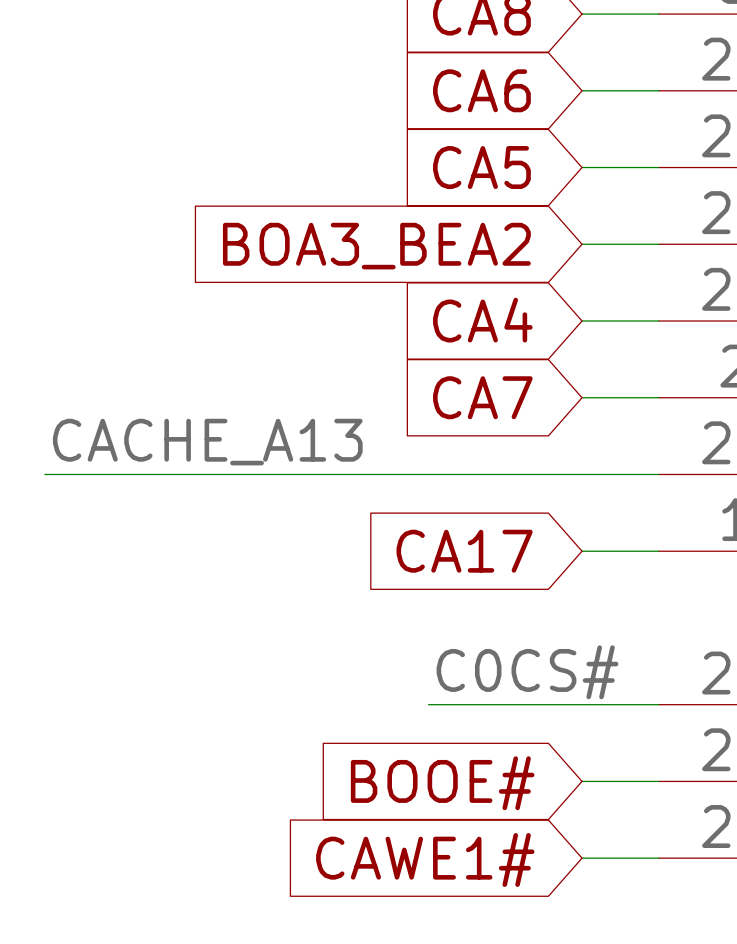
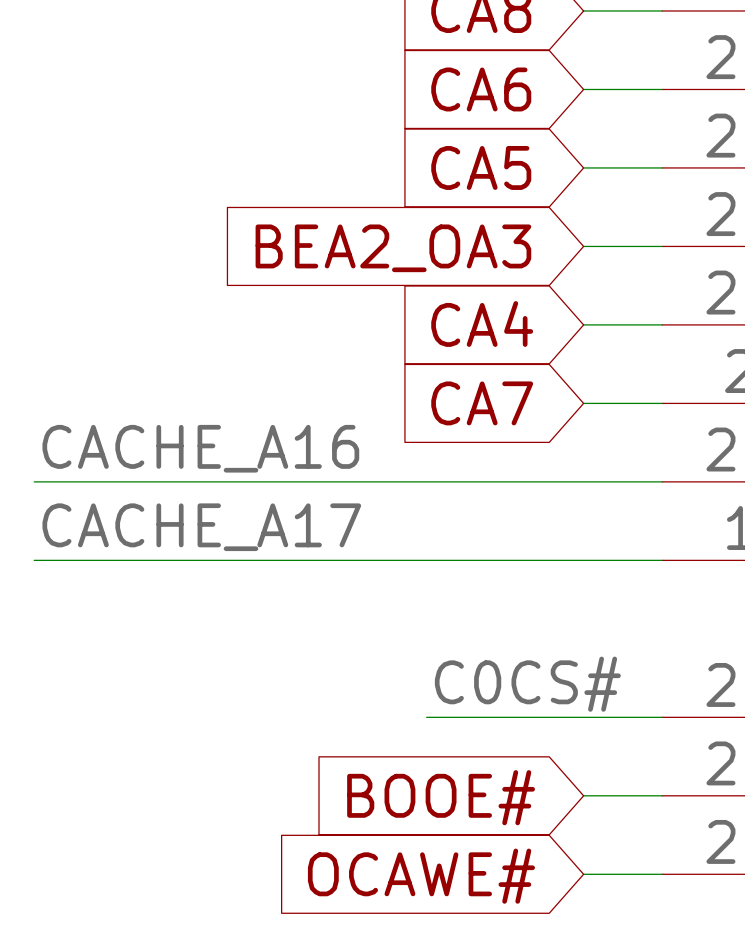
global label: BOA3_BEA2 (376, 246) -> BEA2_OA3 (393, 248)
label: CACHE_A13 (207, 442) -> CACHE_A16 (200, 448)
label: none -> CACHE_A17 (201, 527)
wire: none -> (34, 560) (583, 560)
global label: CA17 (464, 551) -> none
global label: CAWE1# (425, 859) -> OCAWE# (421, 876)

